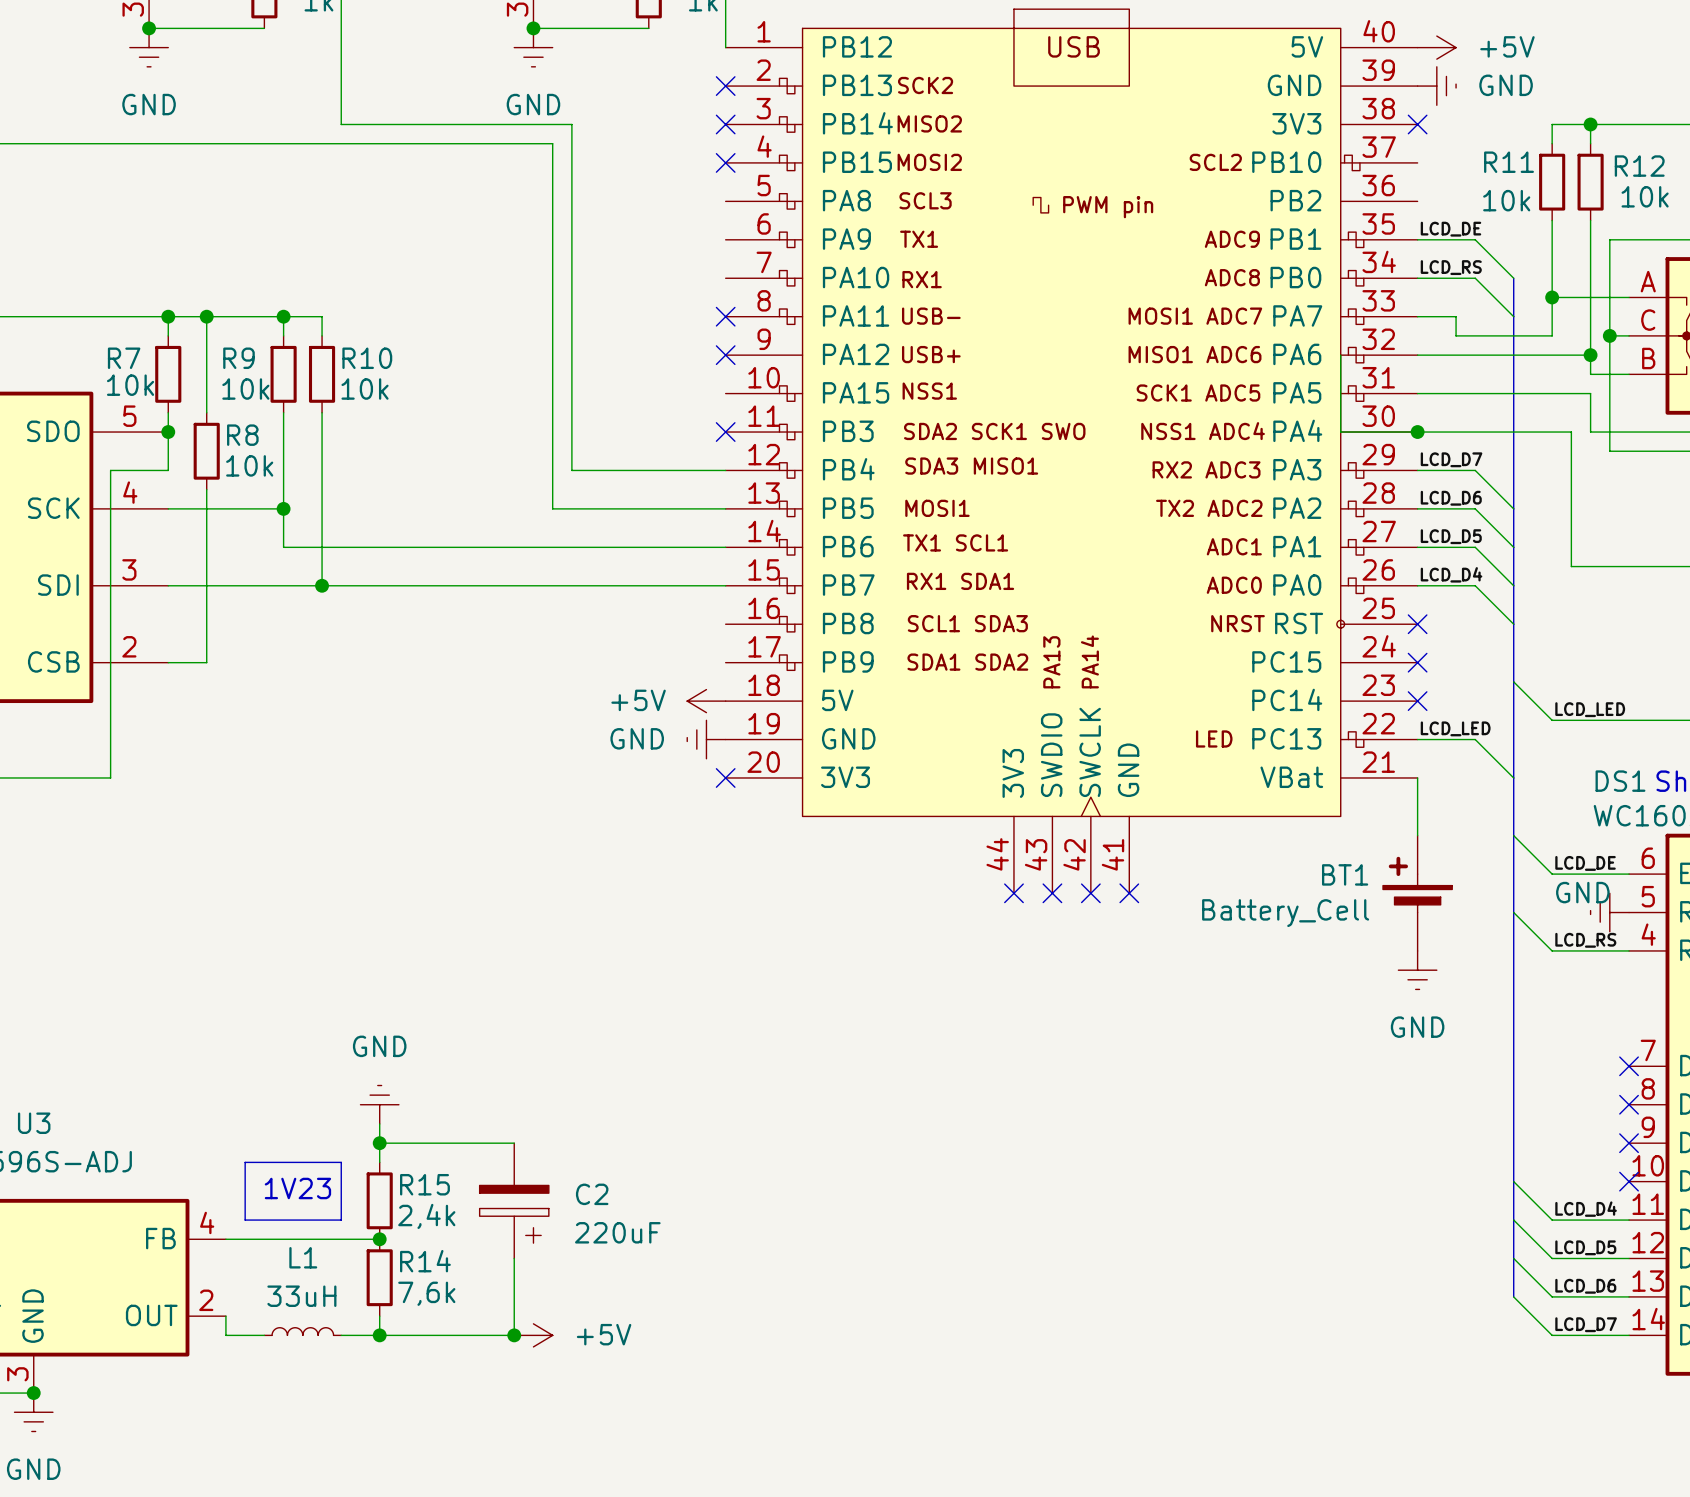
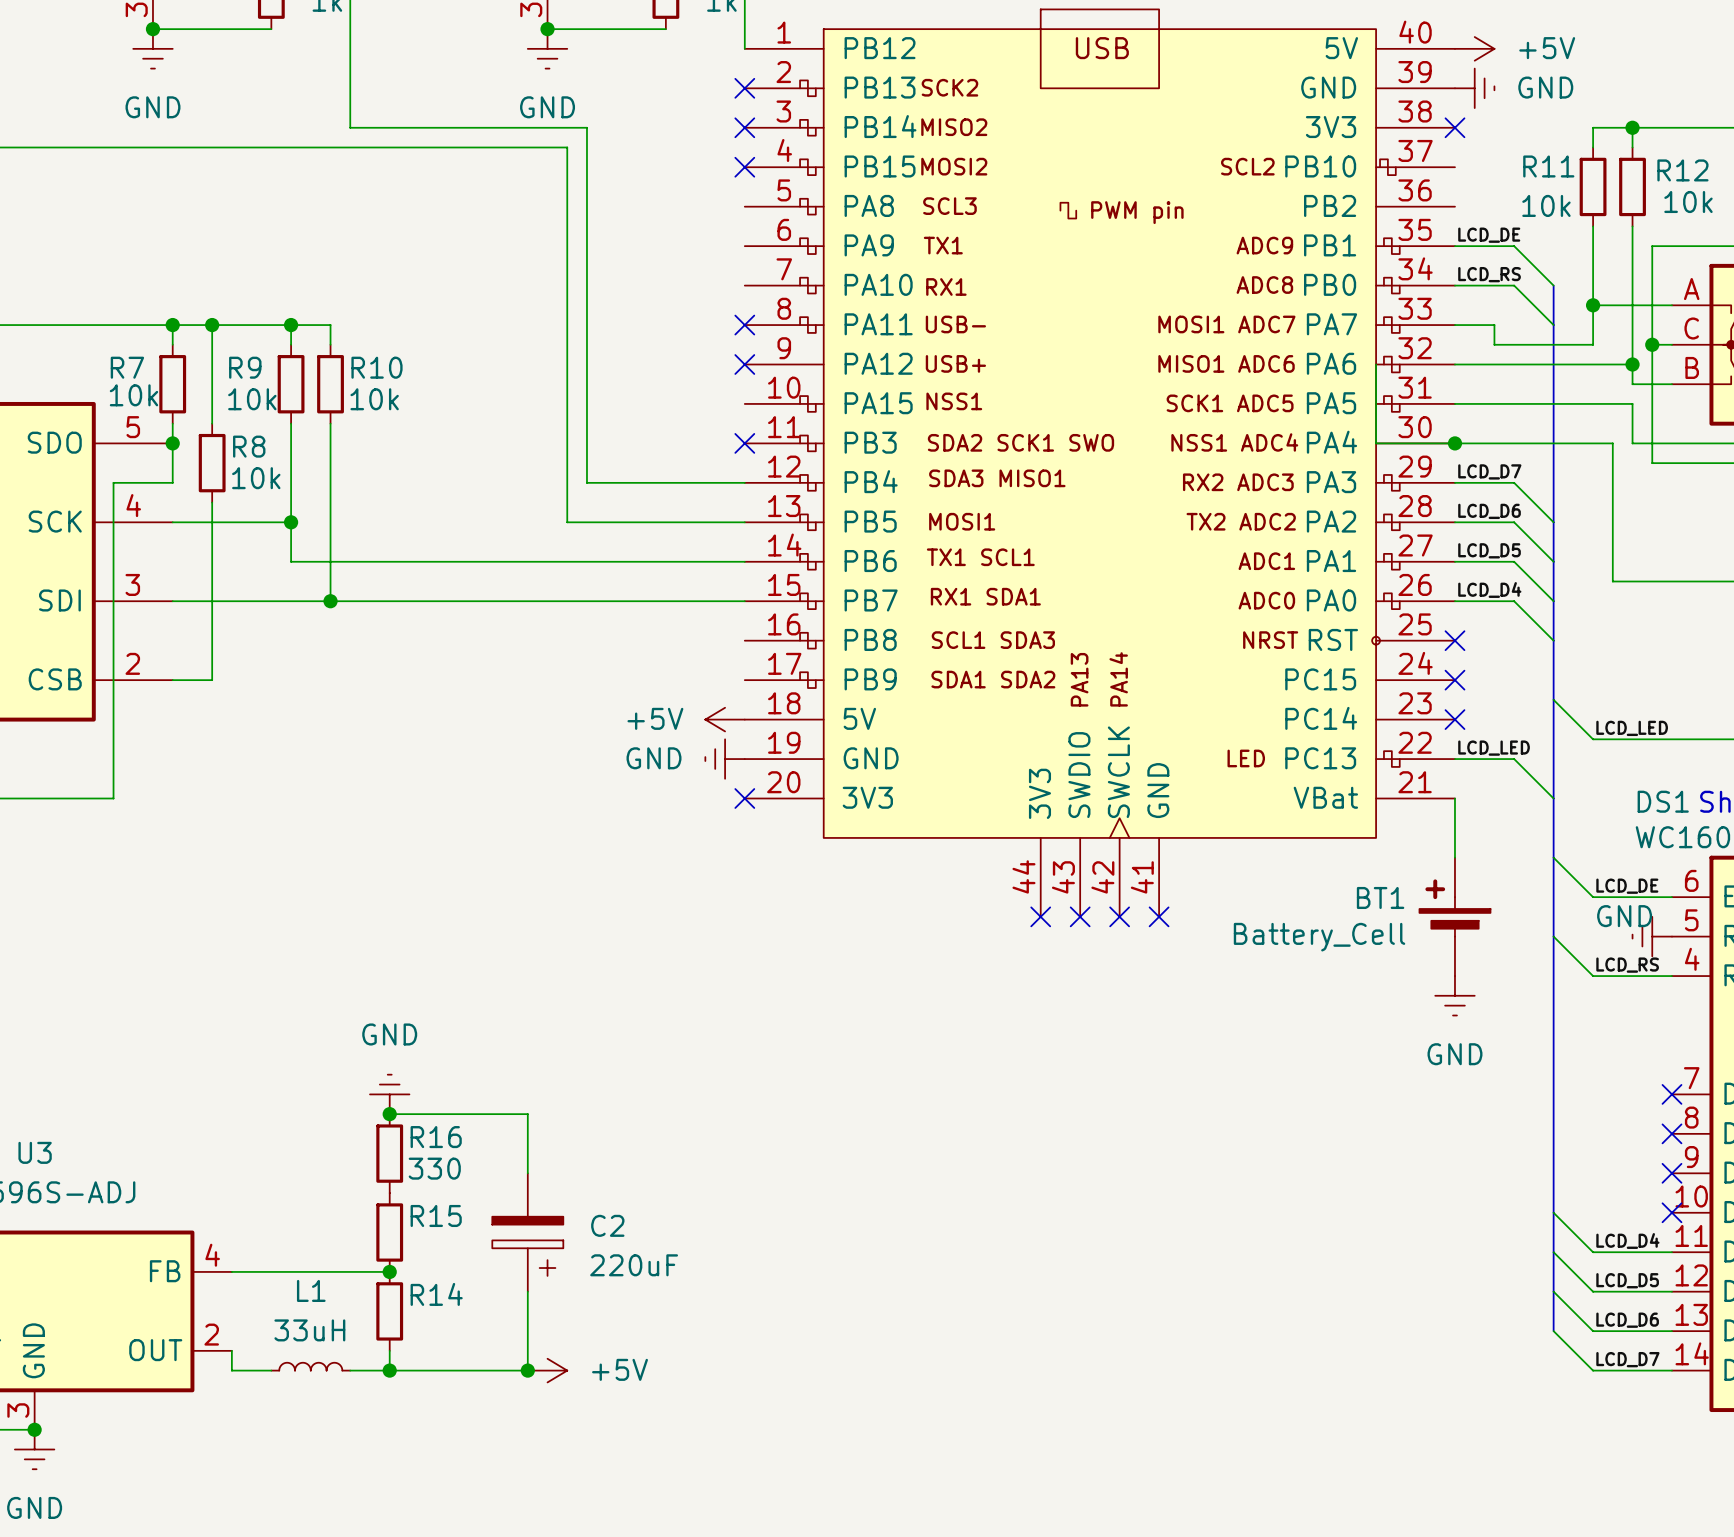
power symbol position: GND (379, 1104) -> GND (389, 1094)
wire: (379, 1123) (379, 1162) -> none
R16: none -> 330 (389, 1153)
wire: (379, 1143) (514, 1143) -> (389, 1114) (527, 1114) (527, 1173)
junction position: (379, 1143) -> (389, 1114)
line: (245, 1162) (341, 1162) (341, 1220) (245, 1220) (245, 1162) -> none
text: 1V23 (297, 1188) -> none
R15 value: 2,4k (426, 1216) -> none
R14 value: 7,6k (426, 1293) -> none

